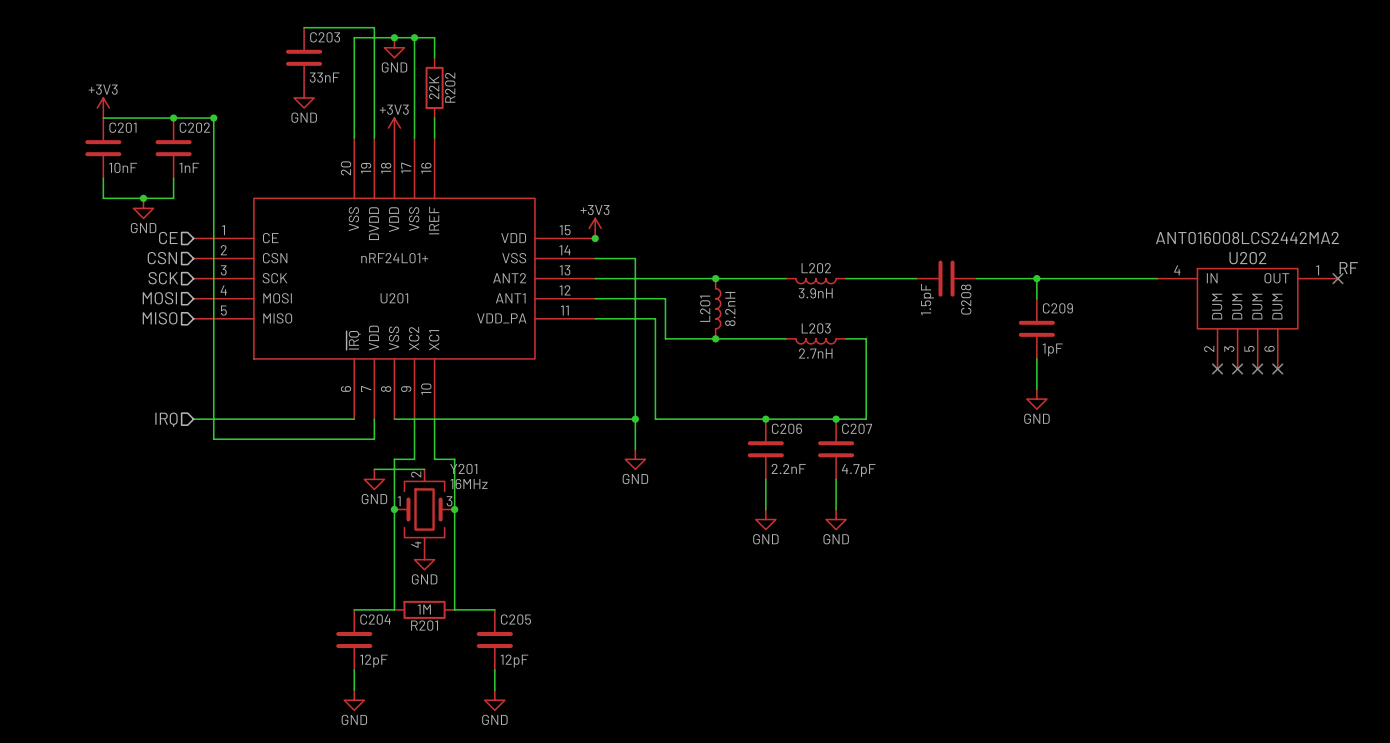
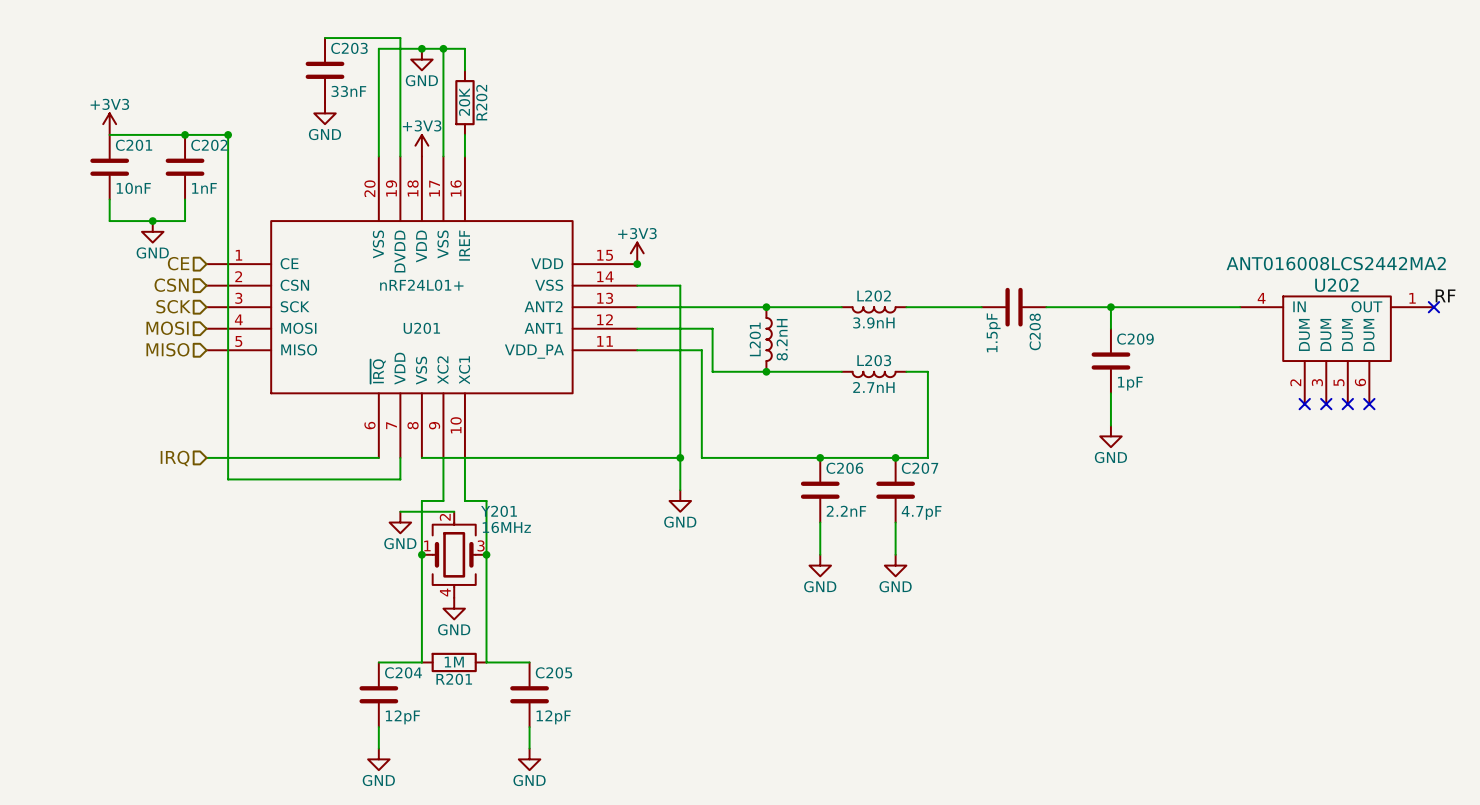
R202 value: 22K (434, 87) -> 20K (464, 101)

